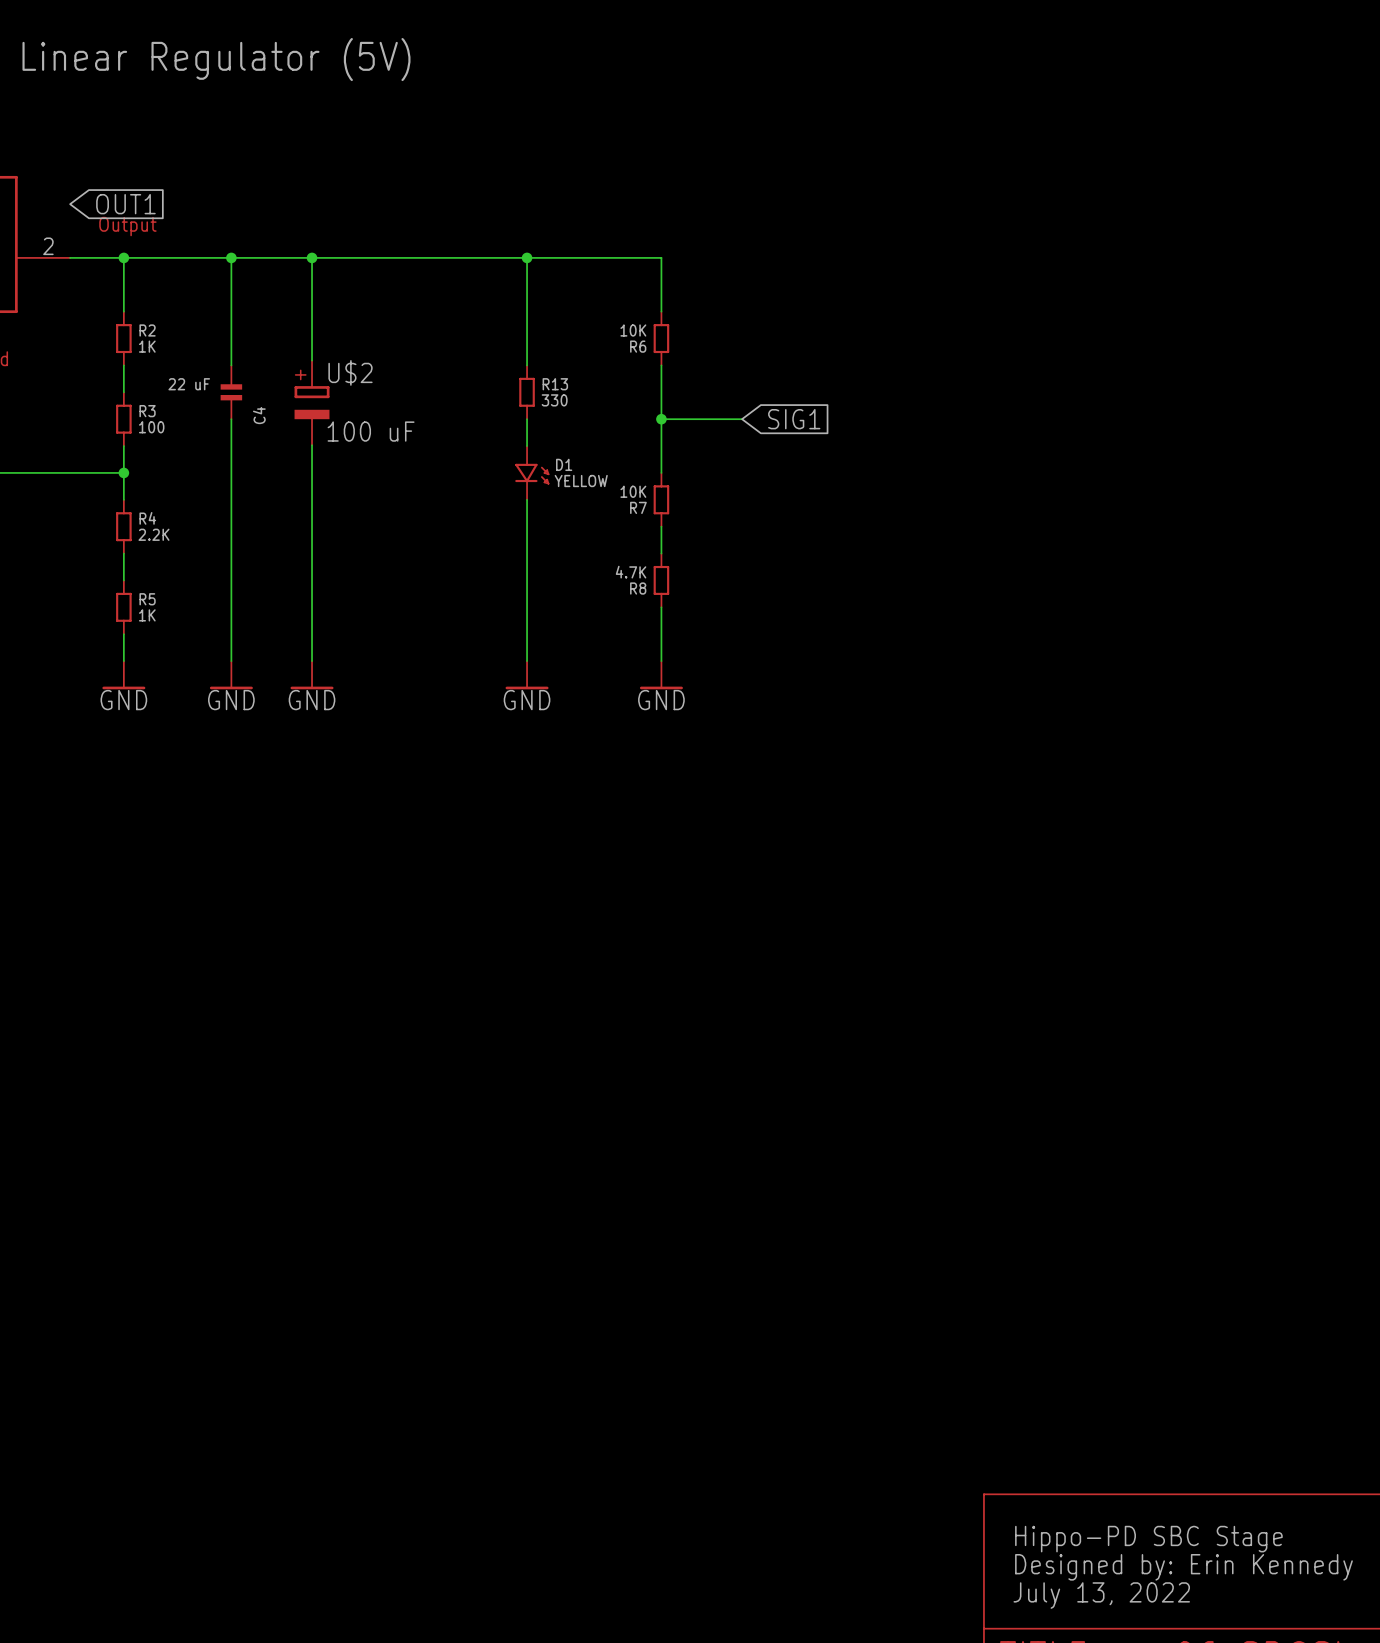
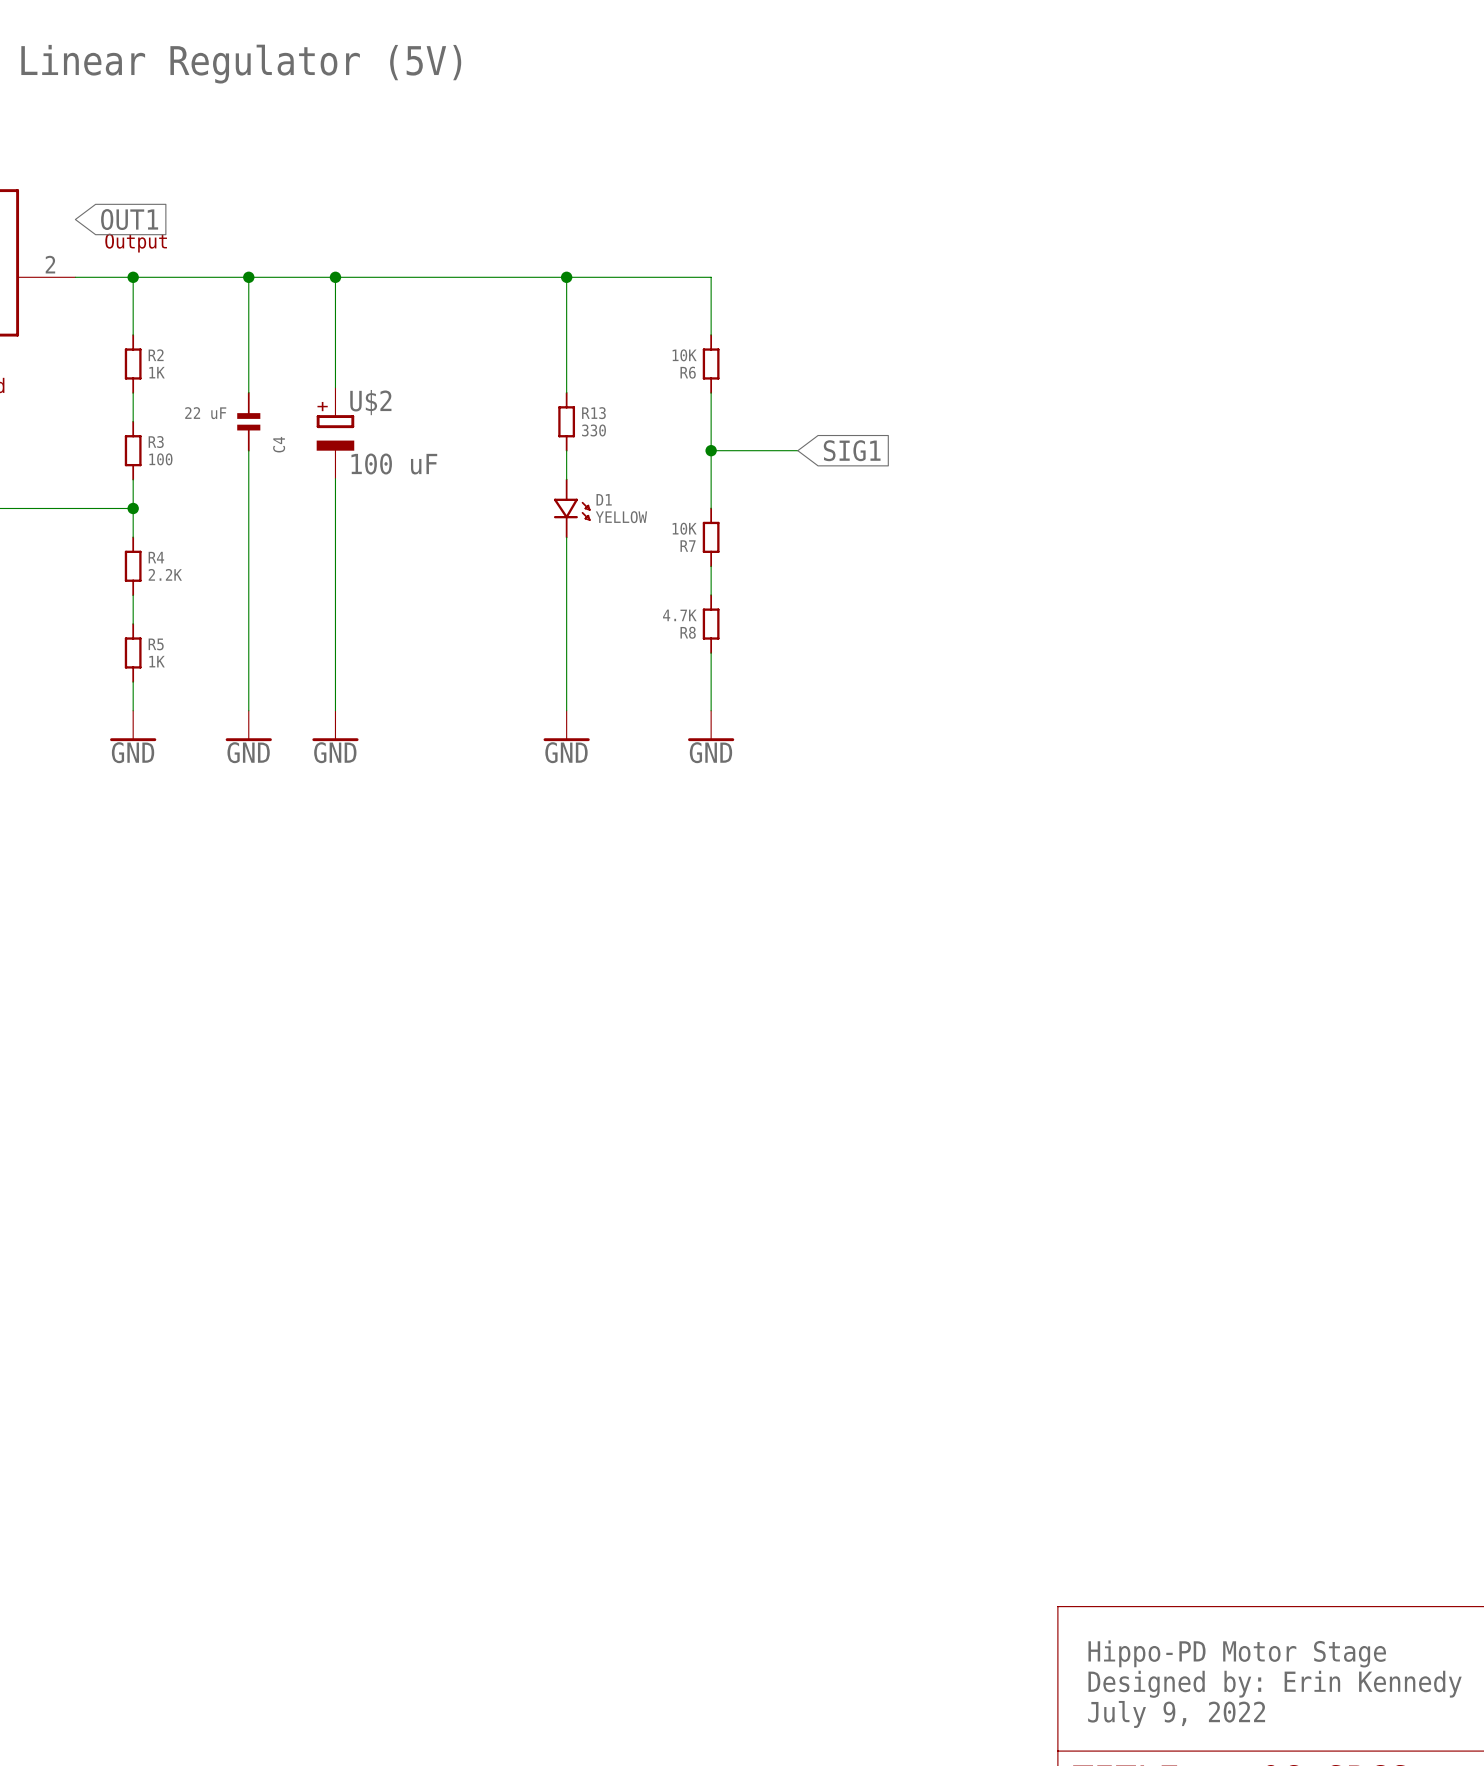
text: Hippo-PD SBC Stage (1148, 1539) -> Hippo-PD Motor Stage (1237, 1653)
text: July 13, 2022 (1101, 1595) -> July 9, 2022 (1176, 1714)

